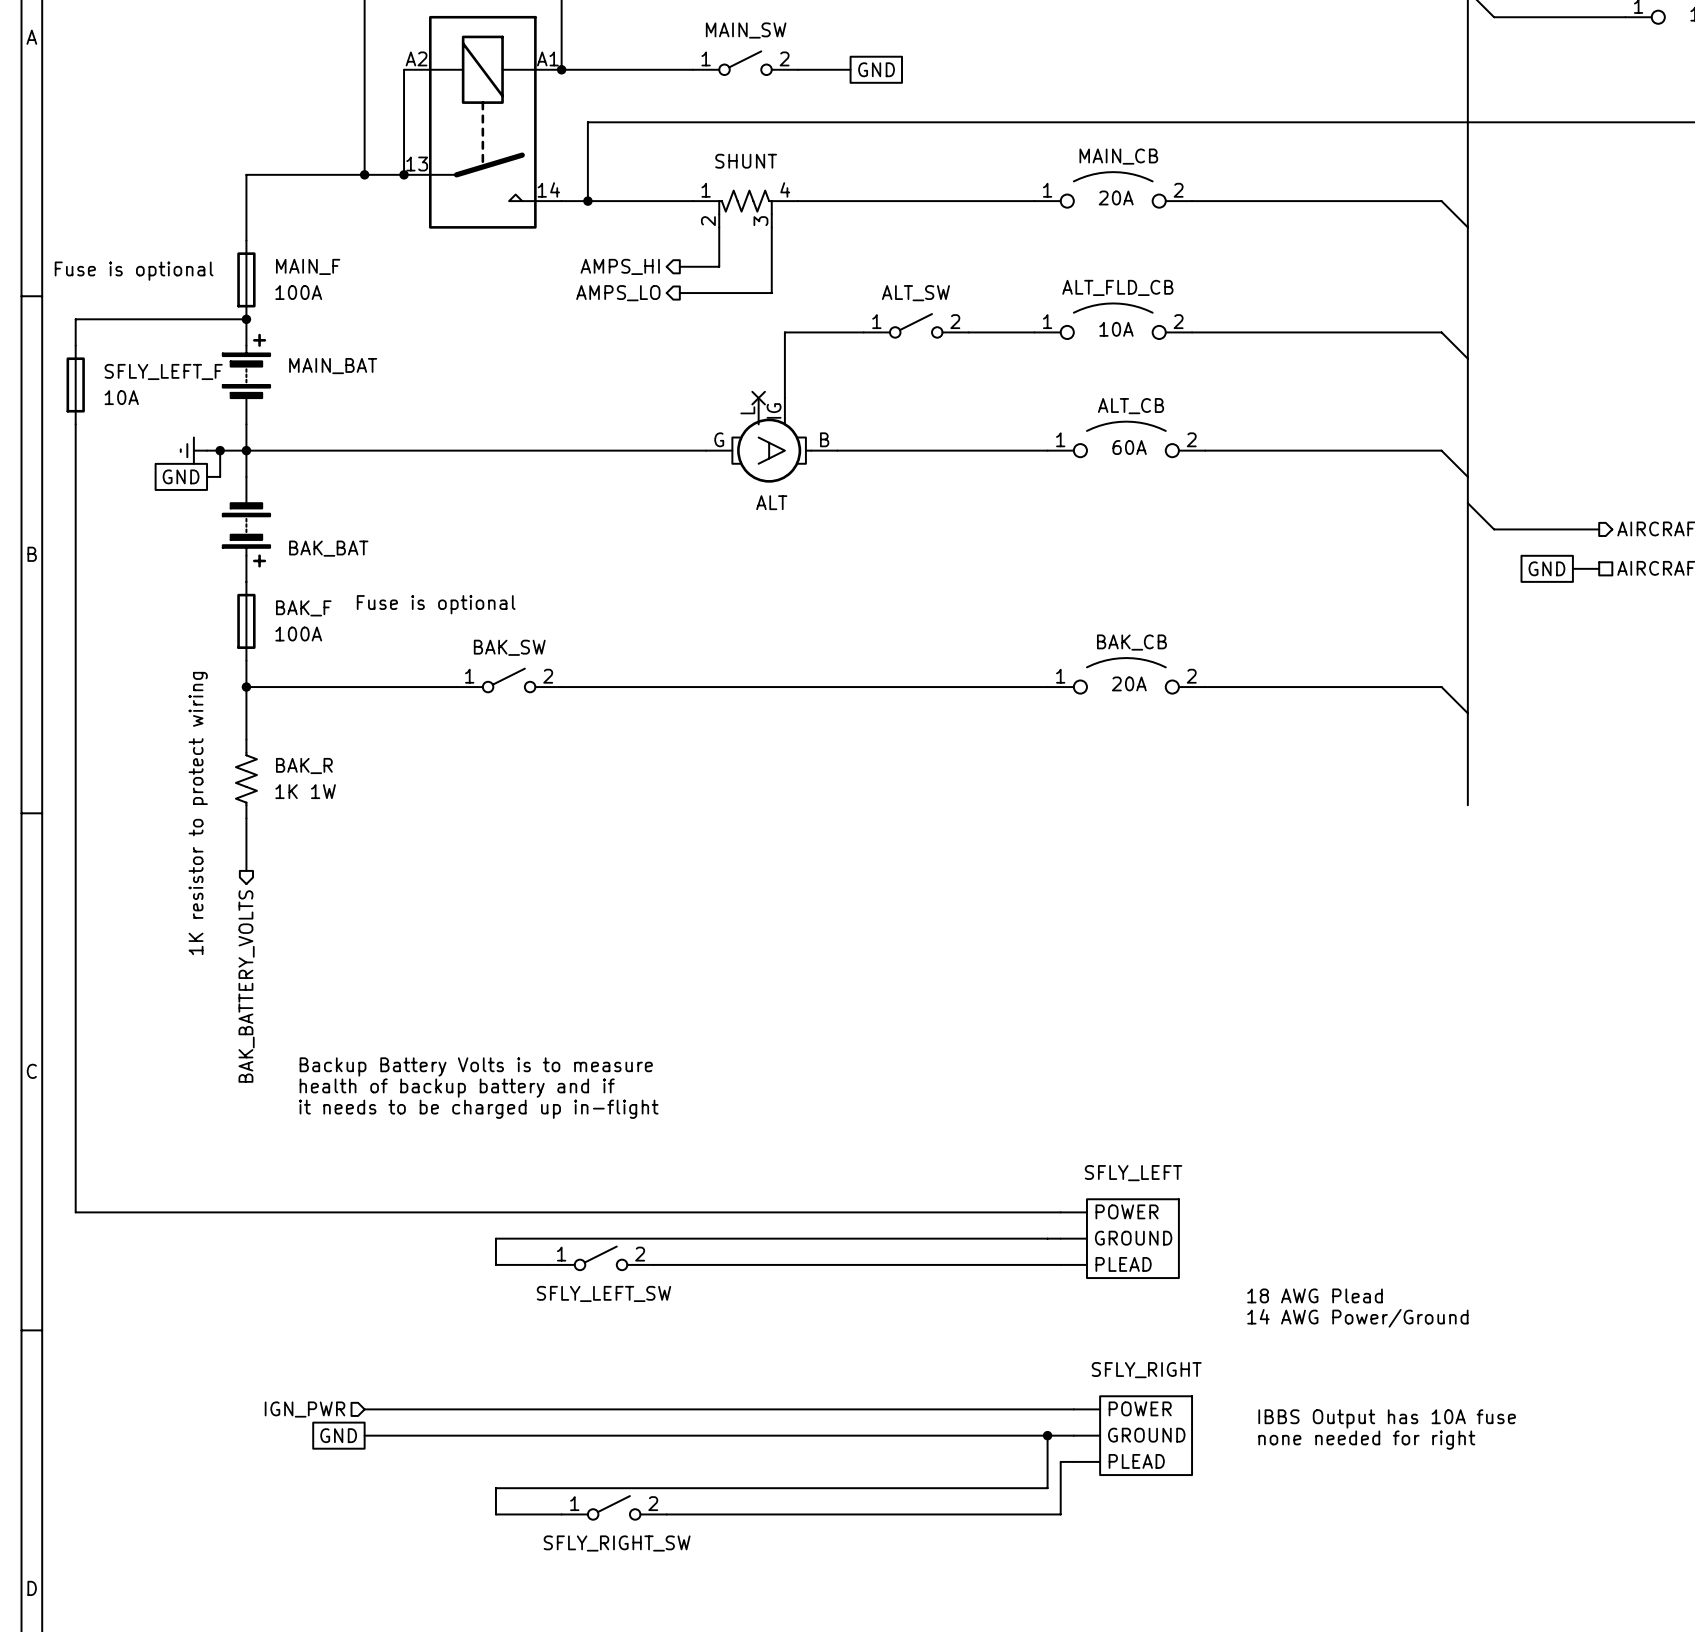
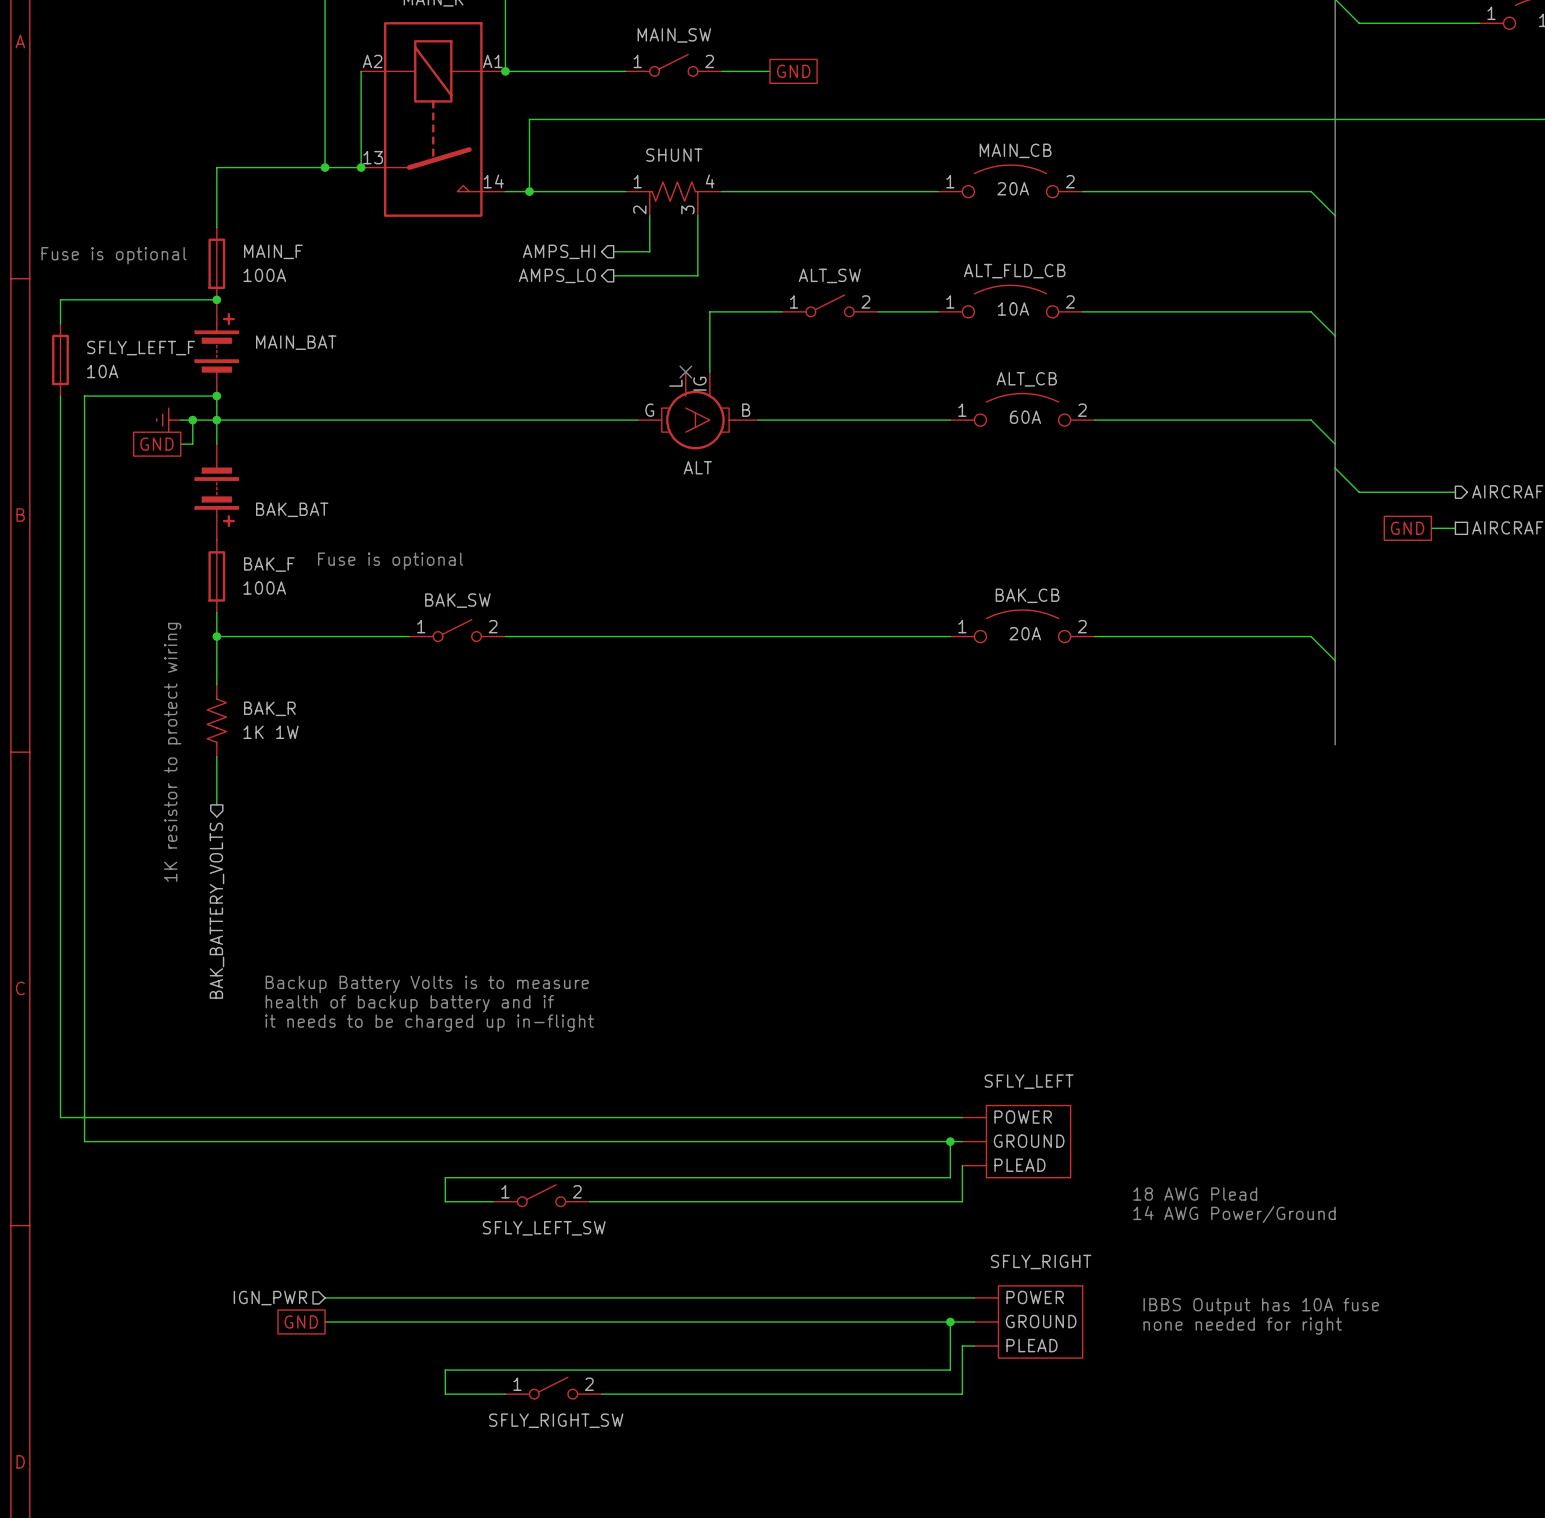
junction: none -> (216, 396)
wire: (495, 1238) (495, 1264) (548, 1264) -> (445, 1141) (84, 1141) (84, 396) (216, 396)
wire: none -> (950, 1141) (950, 1177) (445, 1177) (445, 1201) (493, 1201)
junction: none -> (950, 1141)
SFLY_LEFT_SW position: (601, 1258) -> (541, 1195)
wire: (653, 1264) (1060, 1264) -> (589, 1201) (962, 1201) (962, 1165)

